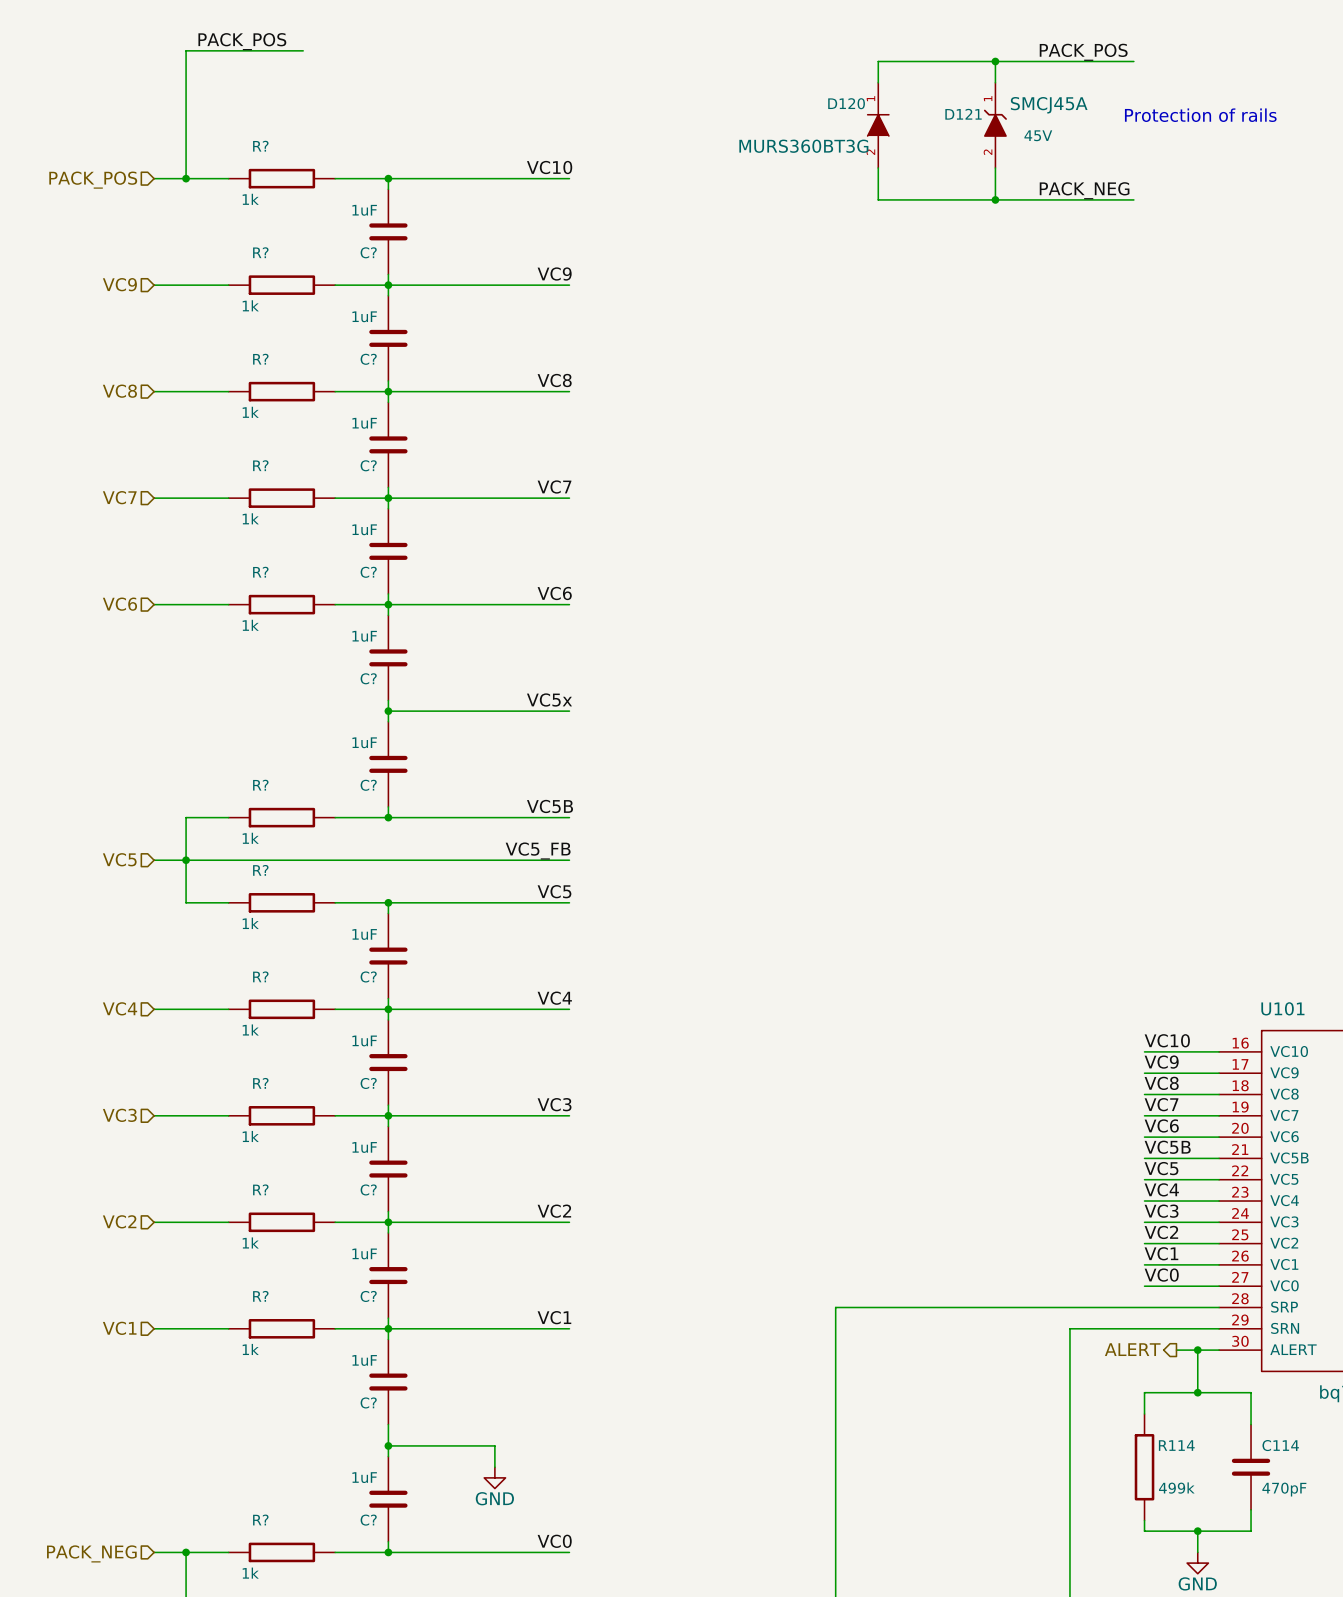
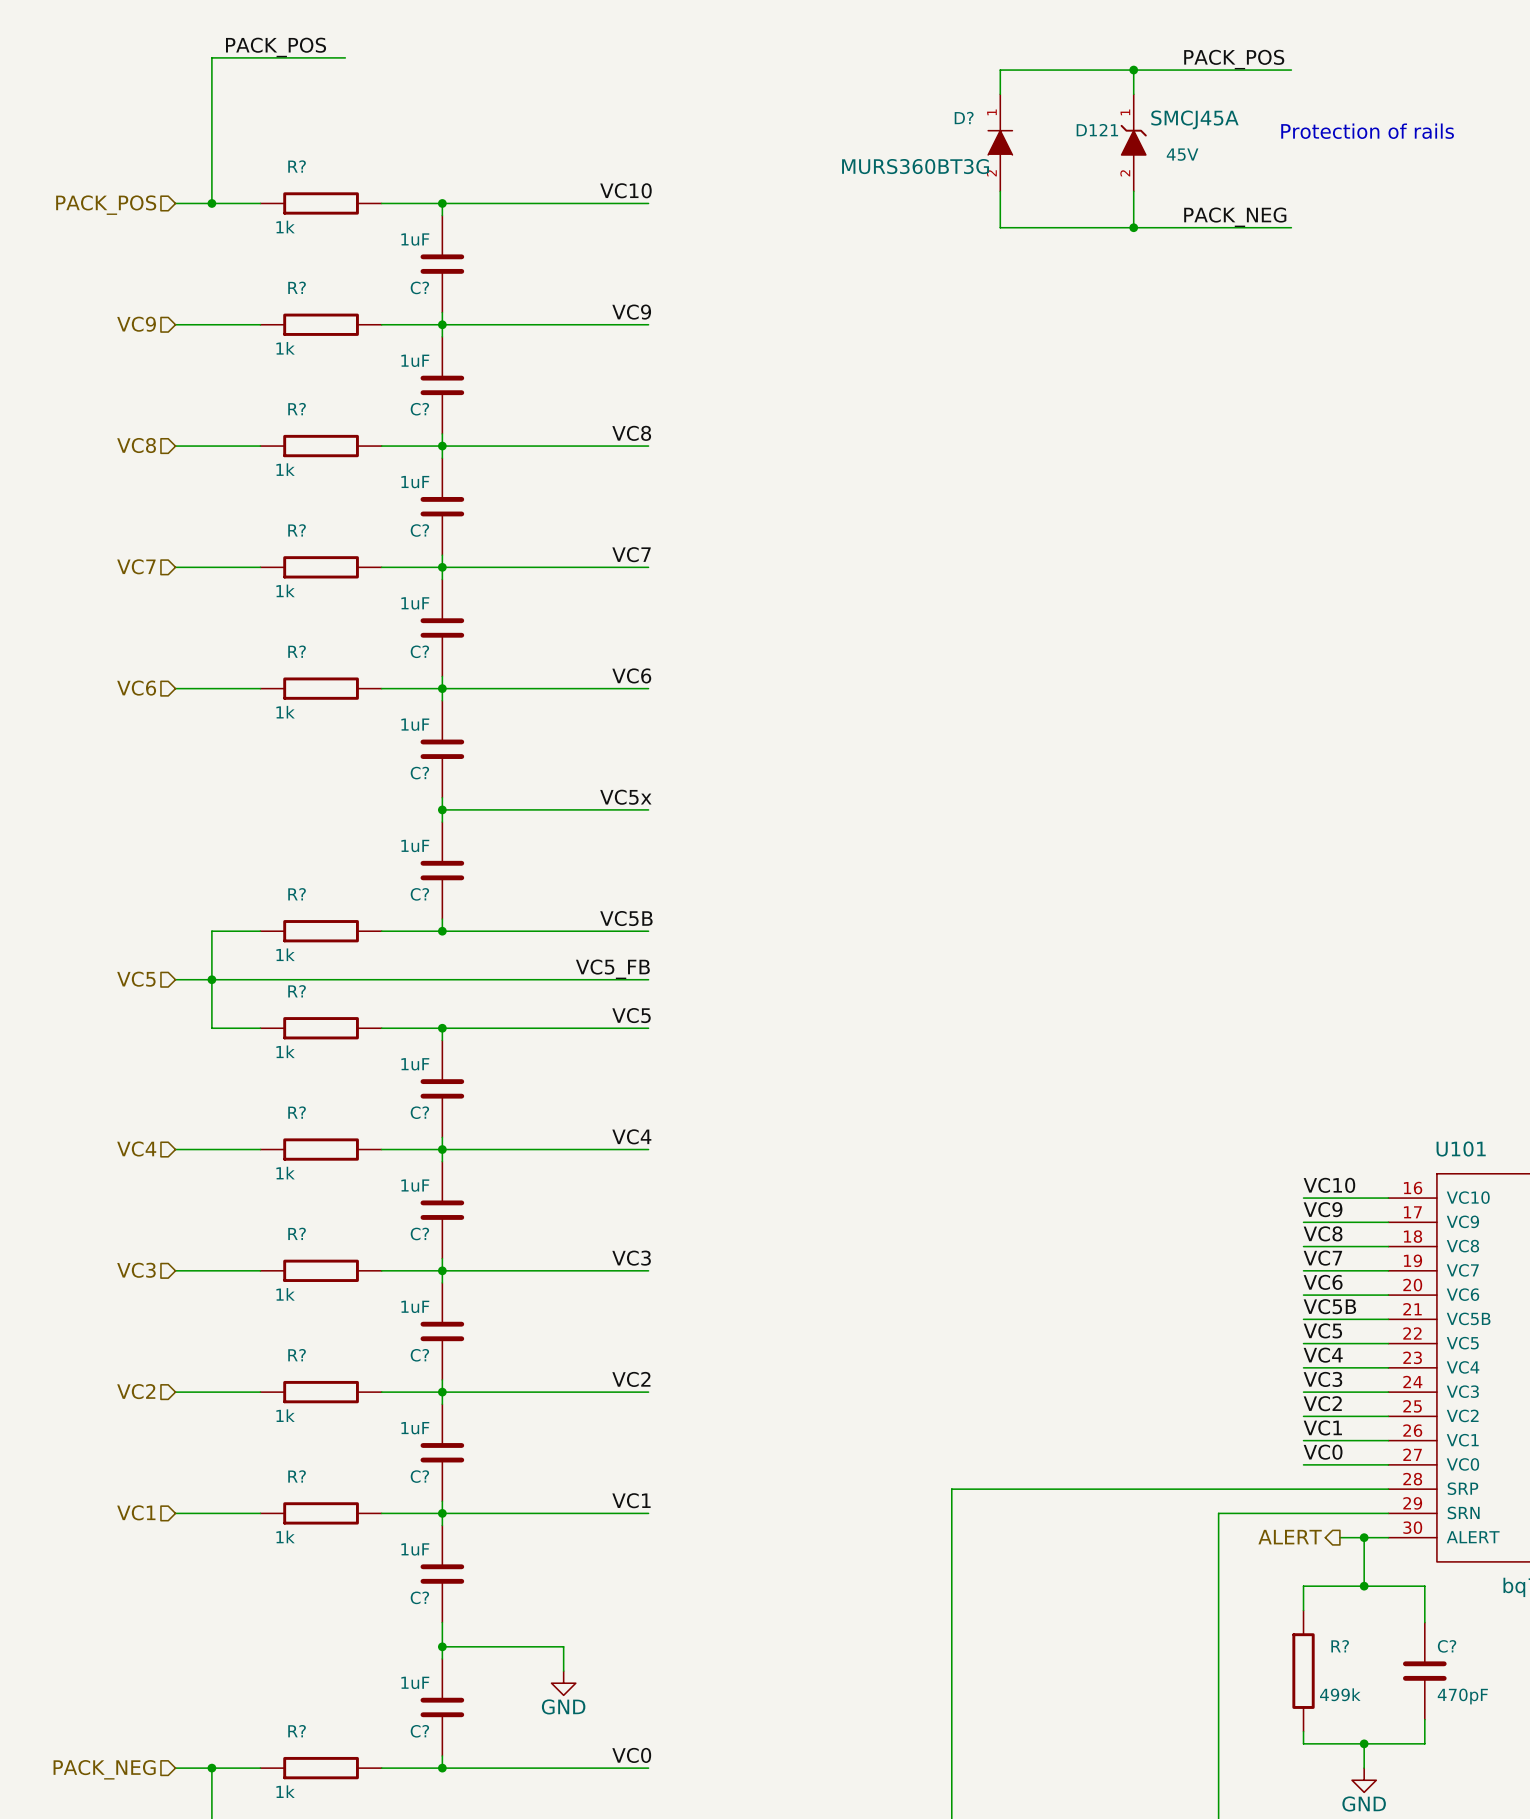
D120 name: D120 (846, 103) -> D? (964, 118)
R114 name: R114 (1176, 1445) -> R? (1340, 1646)
C114 name: C114 (1280, 1445) -> C? (1447, 1646)

